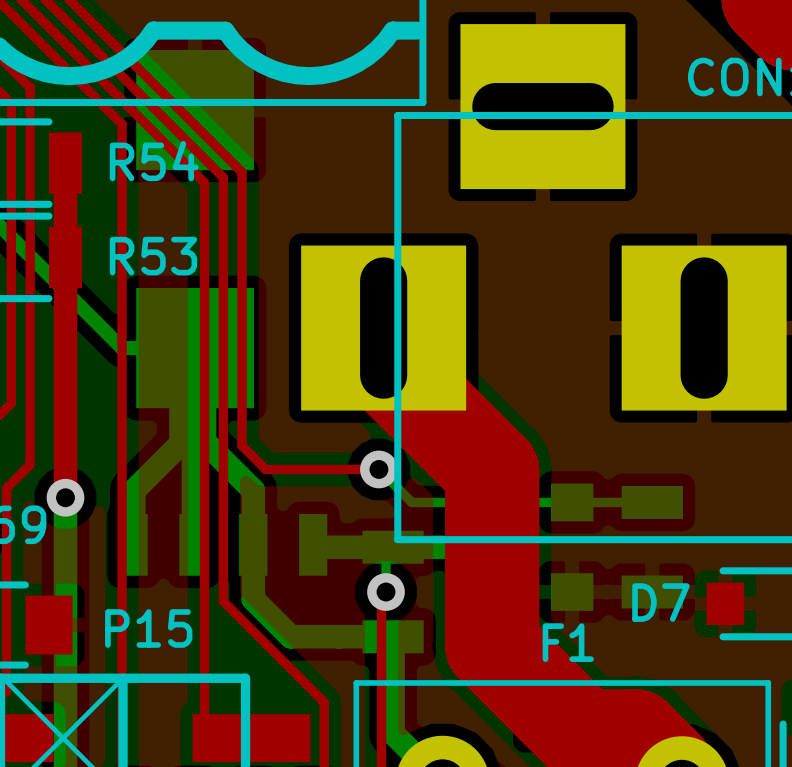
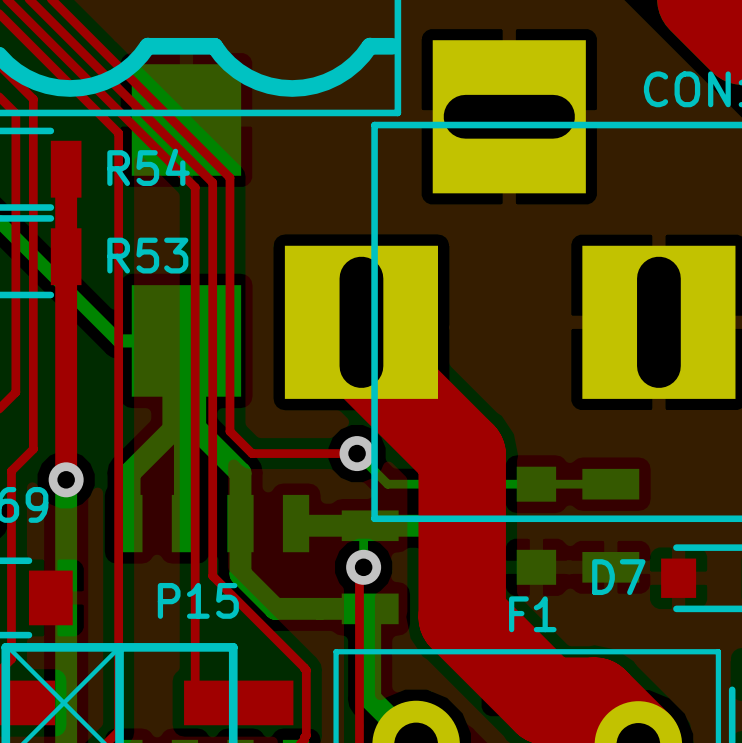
P15 name position: P15 (148, 628) -> P15 (198, 600)

